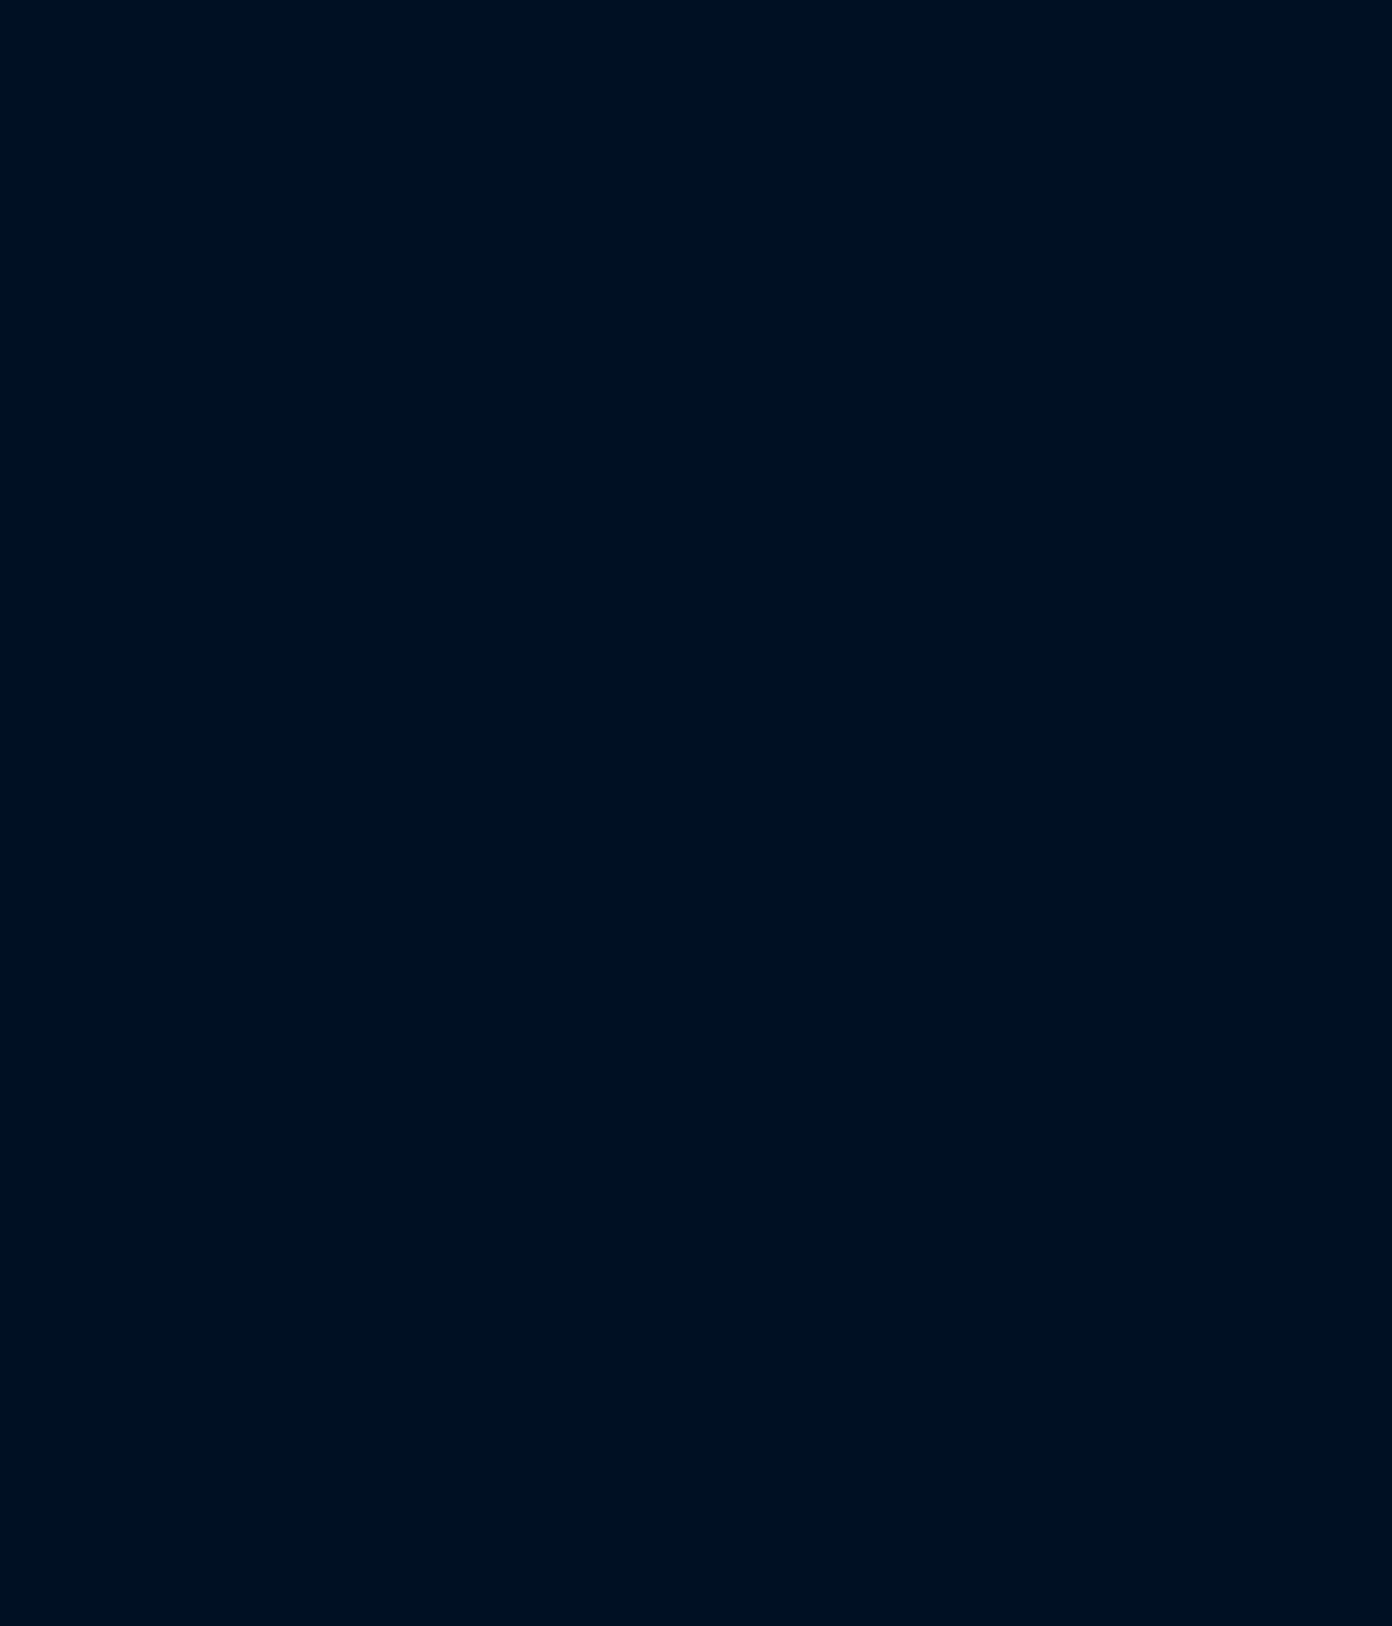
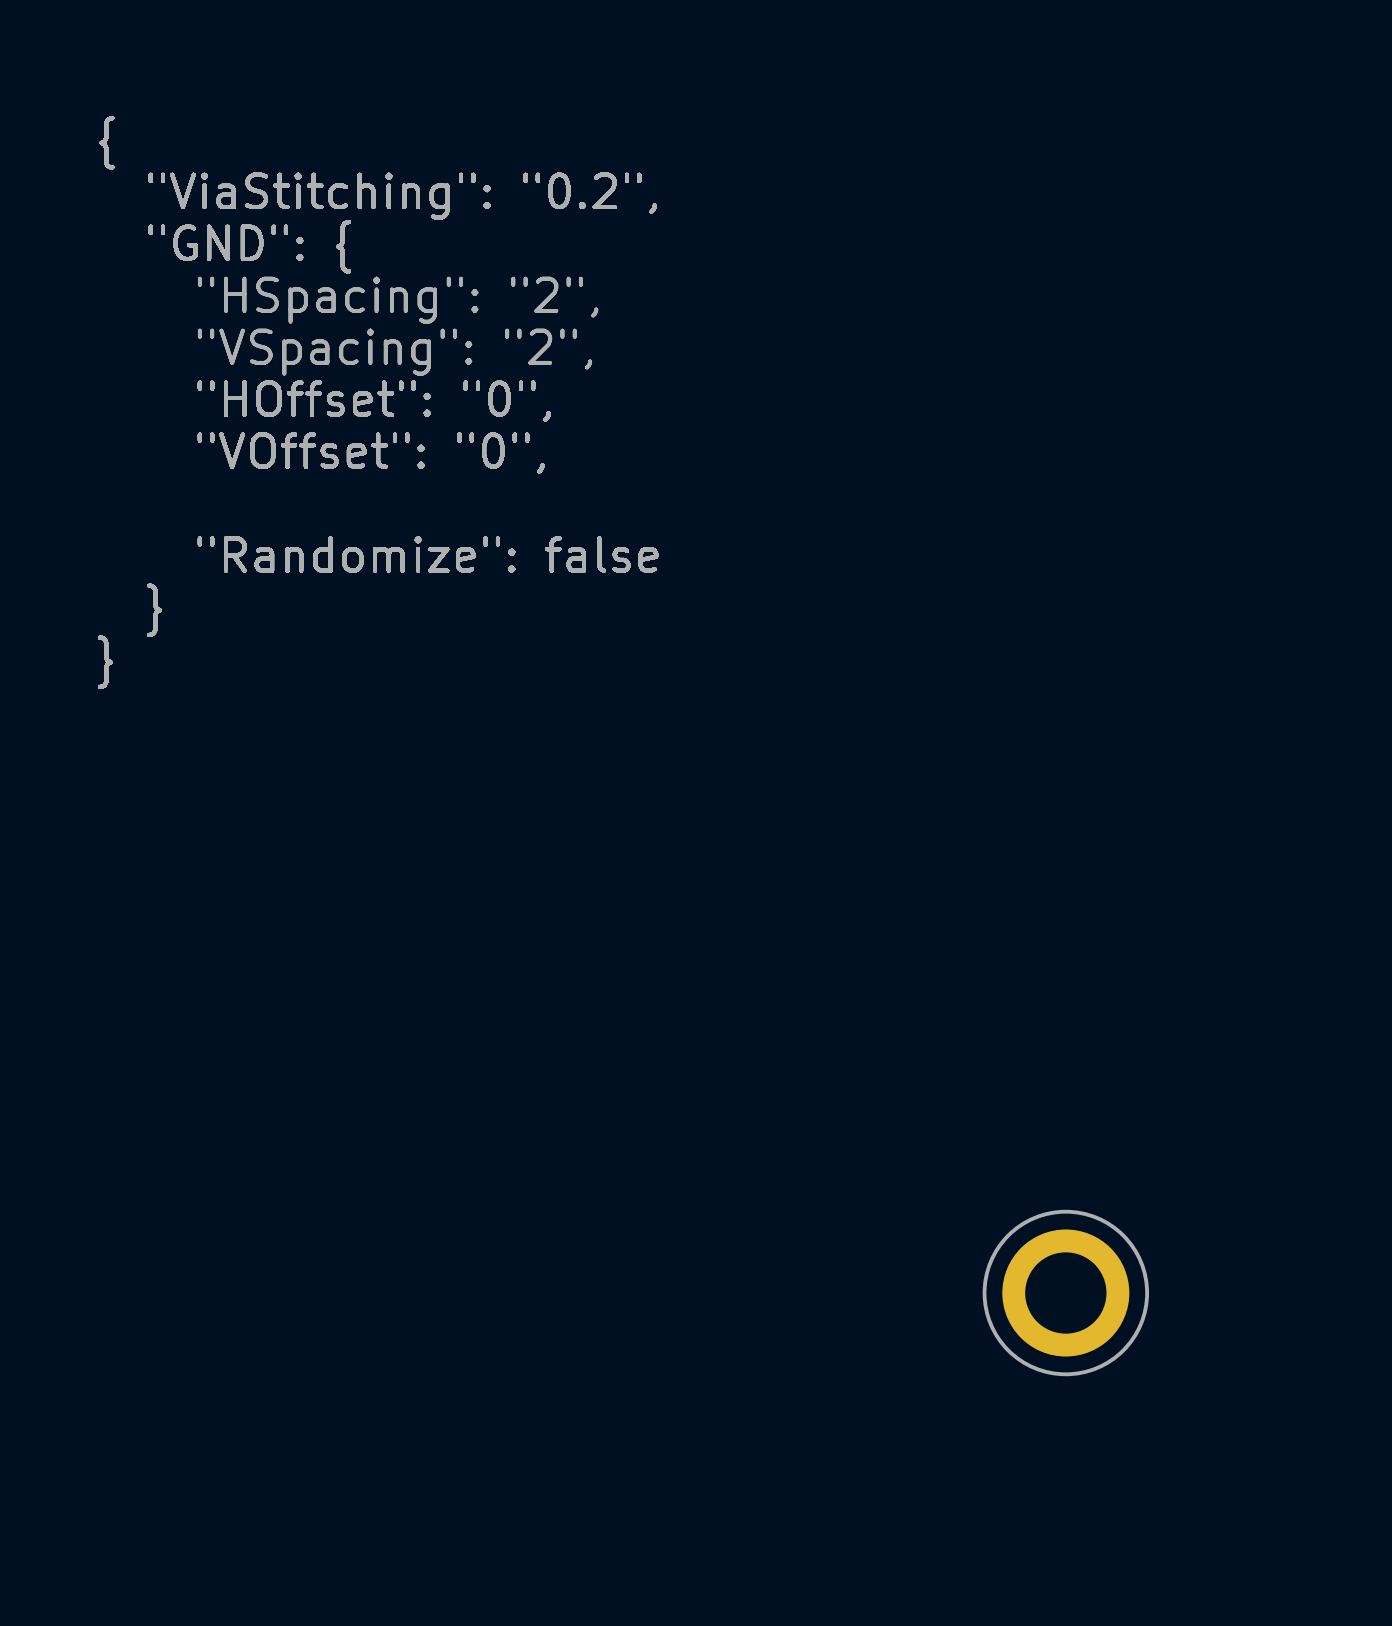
text: none -> { (106, 142)
text: none -> "ViaStitching": "0.2", (402, 196)
text: none -> "GND": { (249, 246)
text: none -> "HSpacing": "2", (398, 300)
text: none -> "VSpacing": "2", (394, 352)
text: none -> "HOffset": "0", (374, 401)
text: none -> "VOffset": "0", (371, 452)
text: none -> "Randomize": false (428, 554)
text: none -> } (154, 610)
text: none -> } (105, 662)
part: none -> (1065, 1293)

